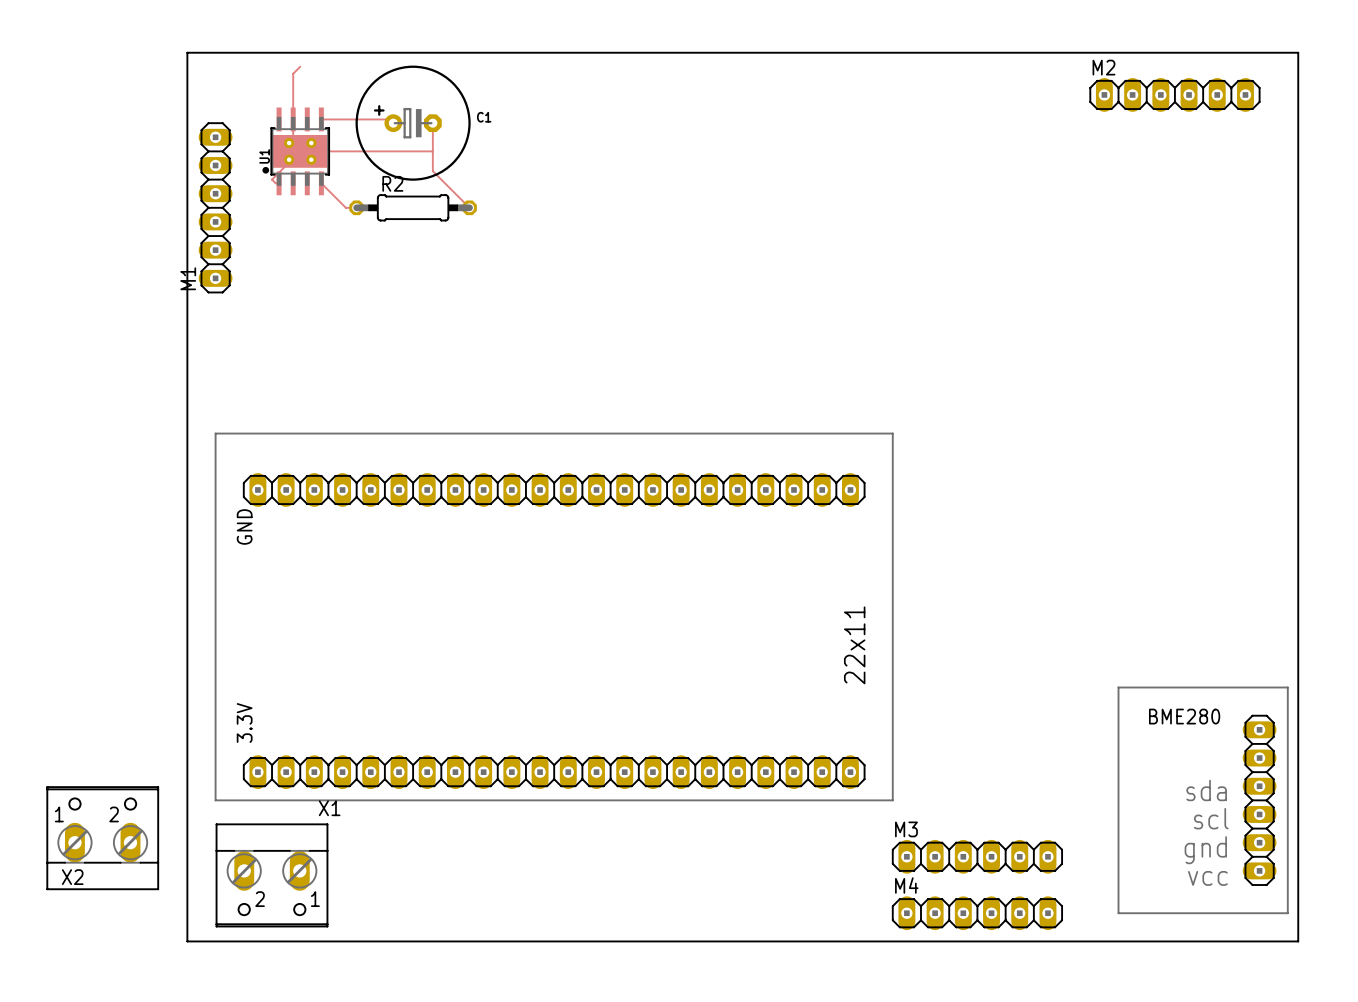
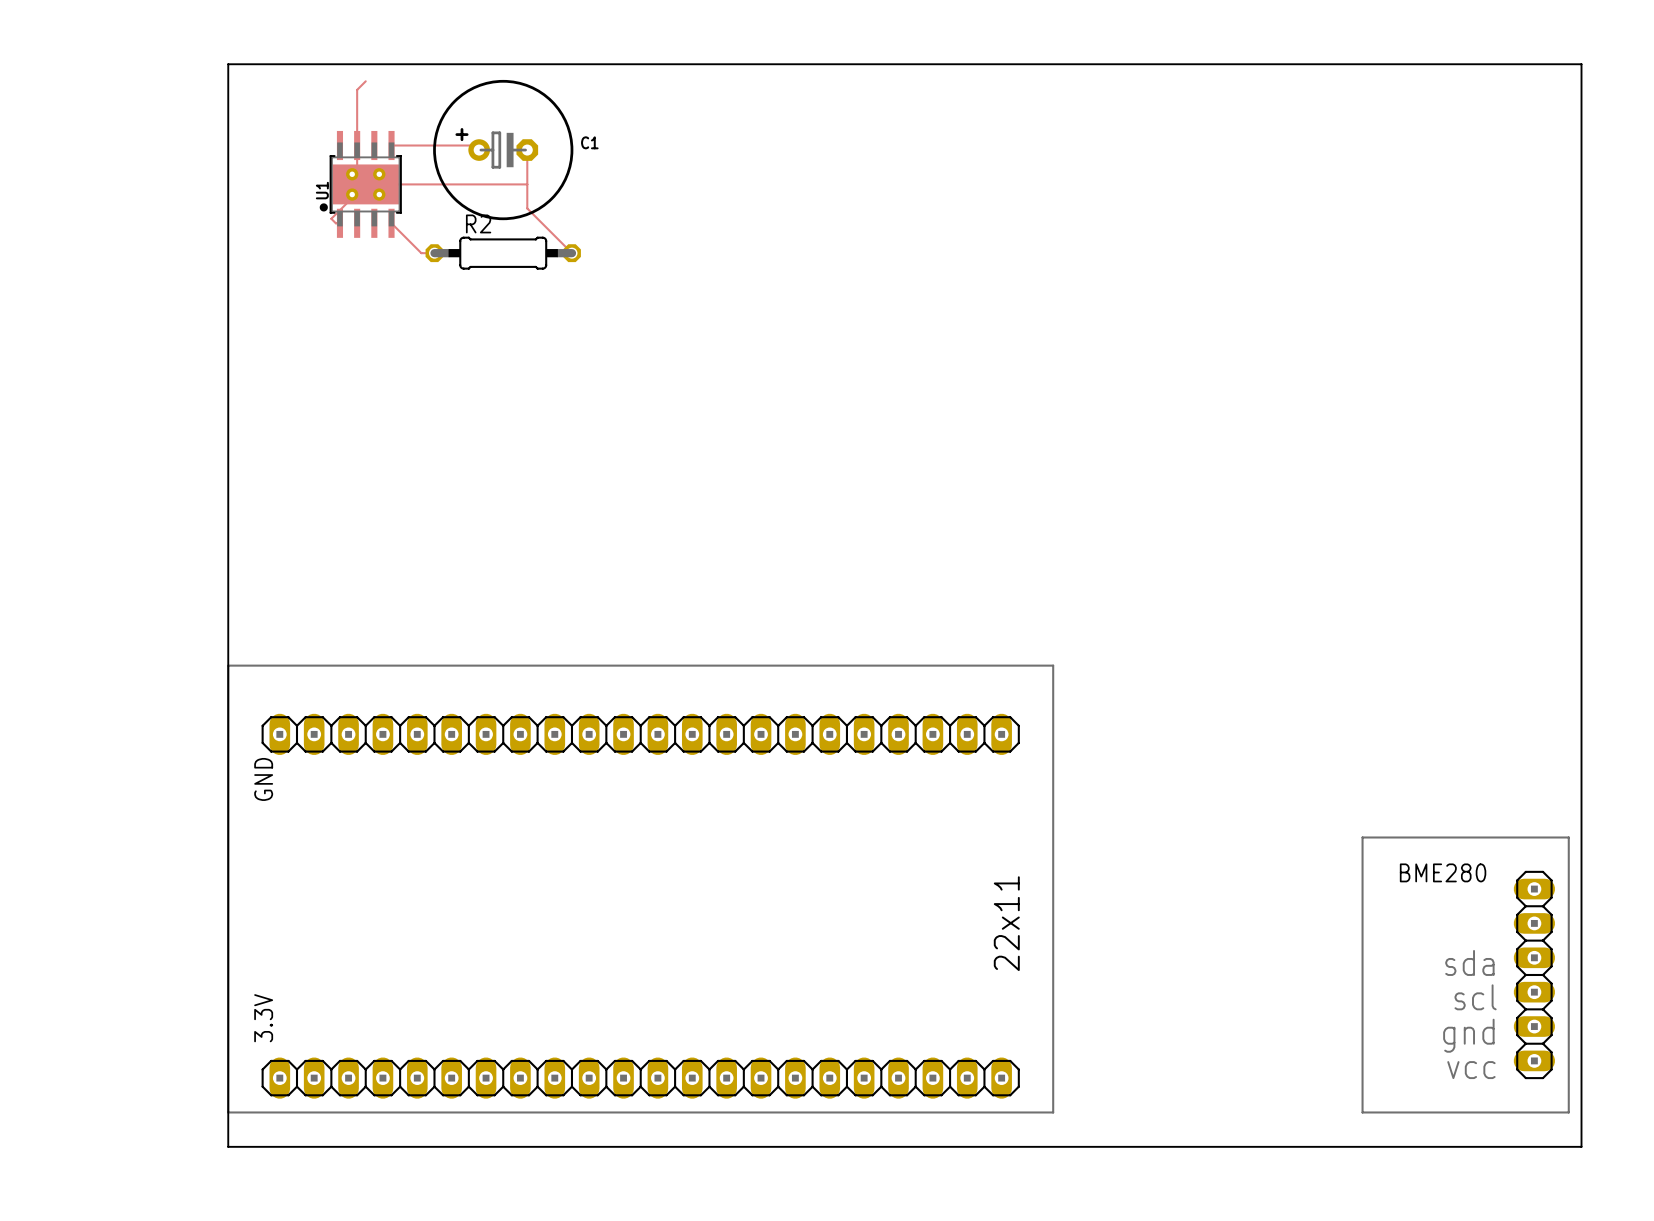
M2: (1174, 94) -> none
M1: (215, 207) -> none
line: (215, 433) (892, 433) (892, 800) (215, 800) (215, 433) -> (228, 665) (1053, 665) (1053, 1112) (228, 1112) (228, 665)
GND position: (554, 489) -> (640, 734)
text position: 22x11 (854, 645) -> 22x11 (1006, 923)
3.3V position: (554, 772) -> (640, 1078)
X2: (102, 838) -> none
M3: (977, 856) -> none
X1: (272, 875) -> none
M4: (977, 913) -> none

